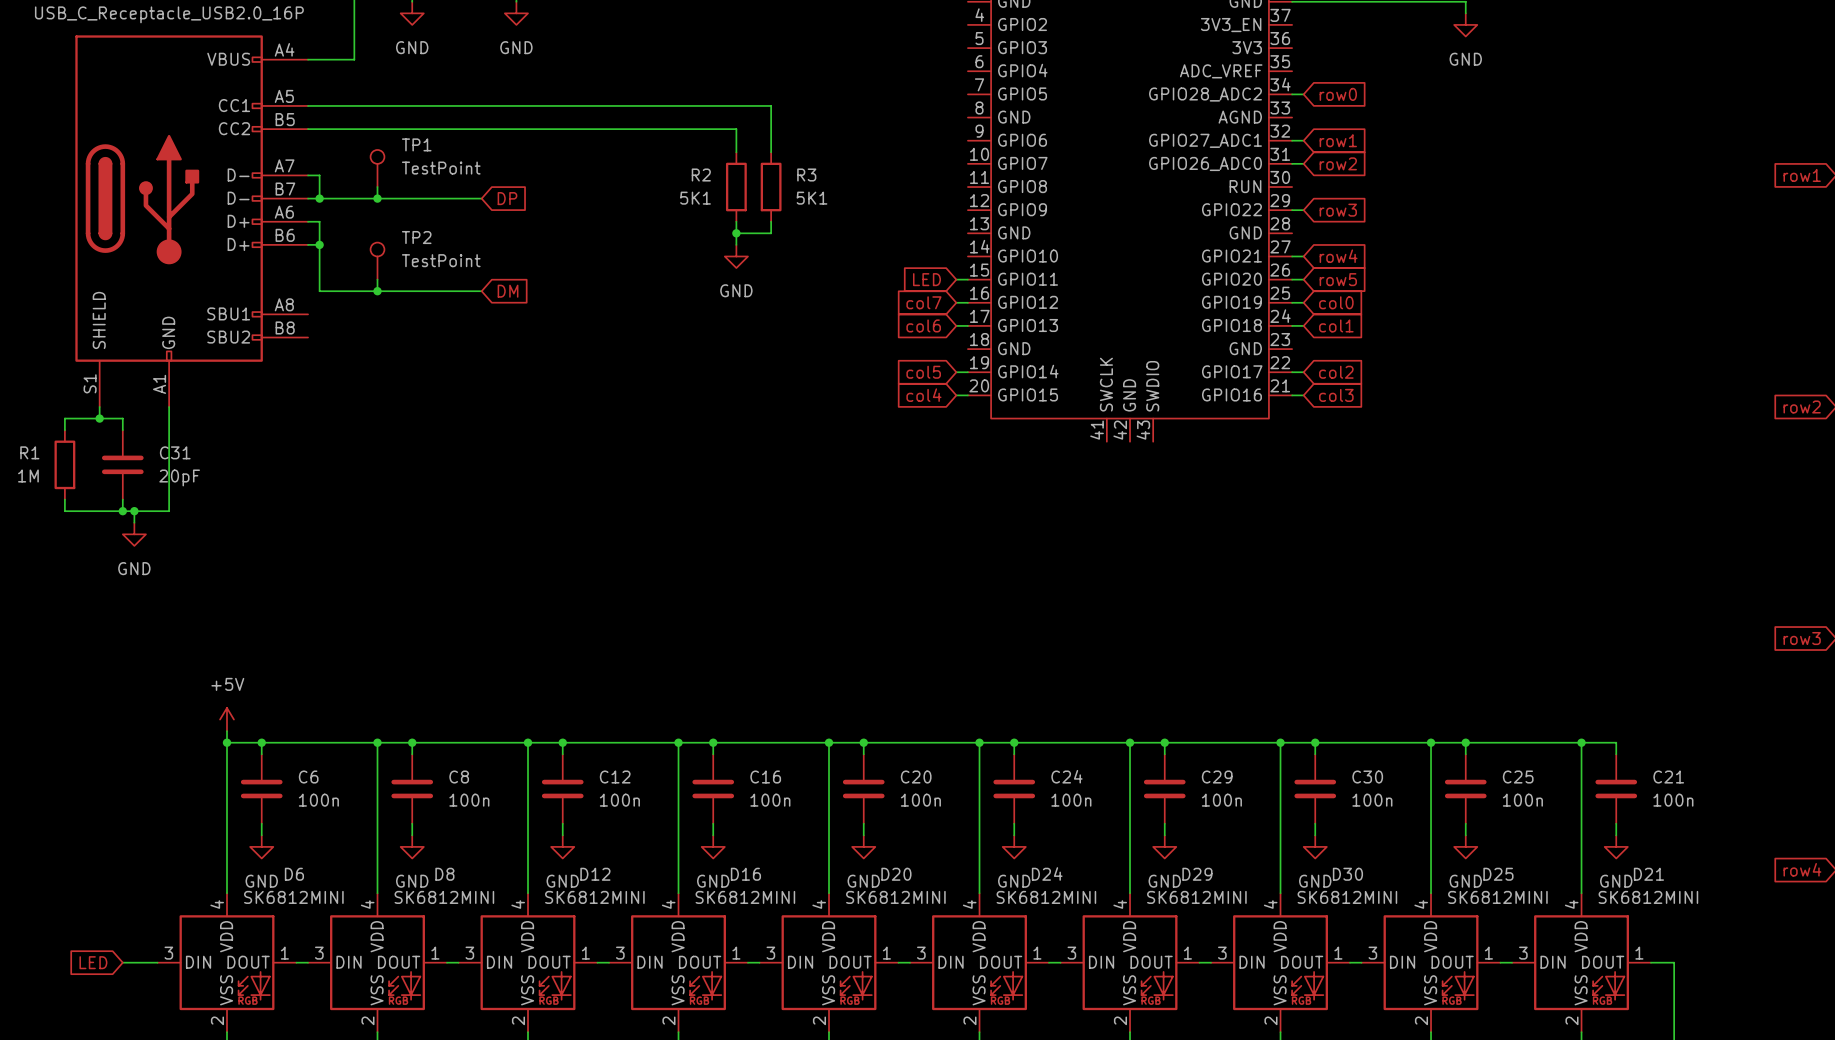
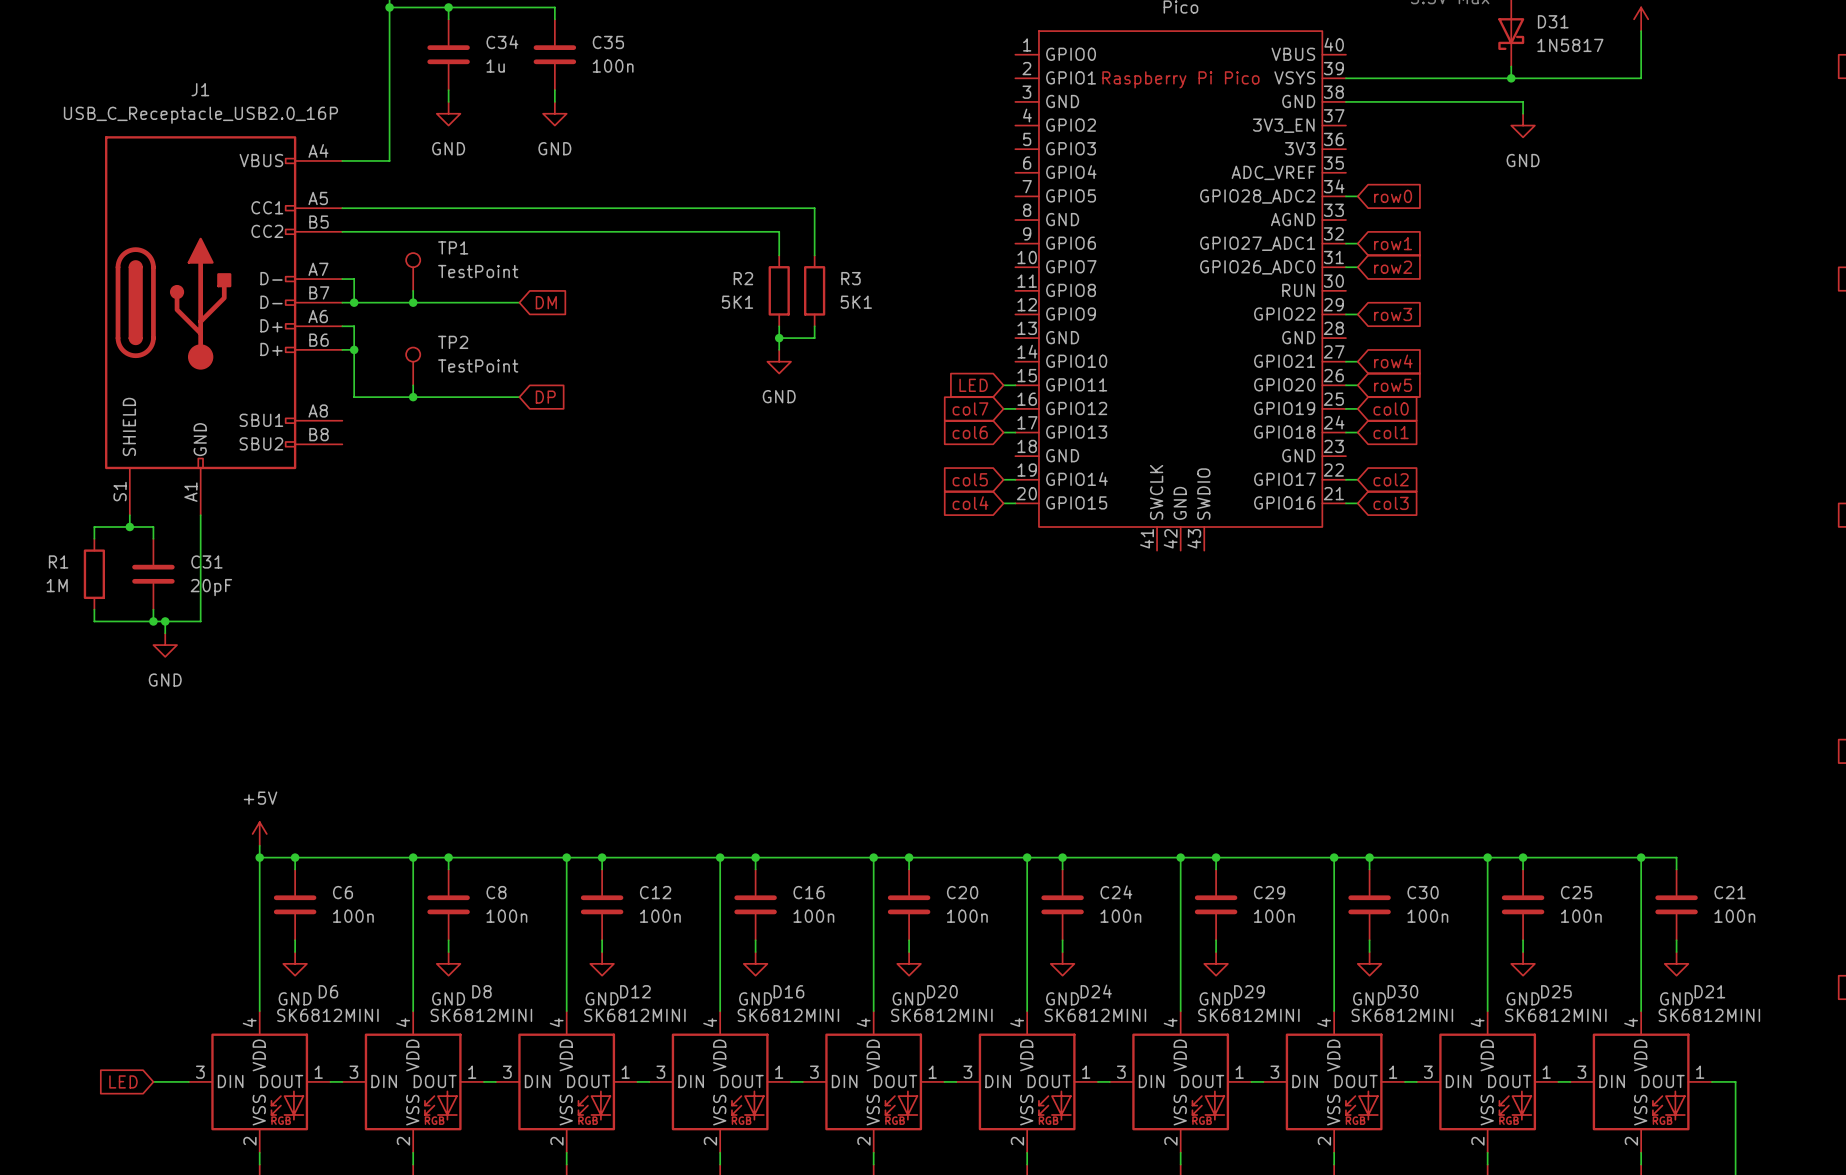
global label: DP (507, 198) -> DM (546, 302)
global label: DM (508, 291) -> DP (545, 397)

